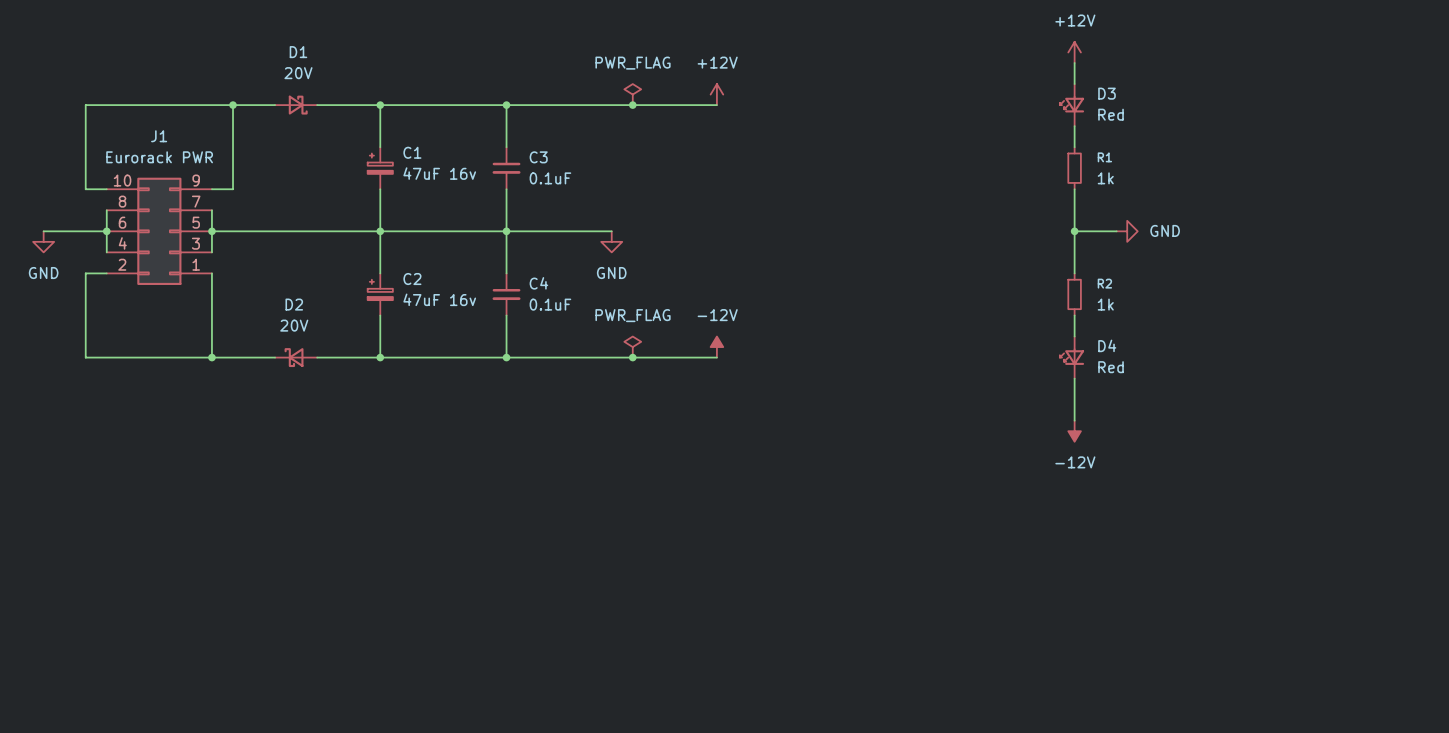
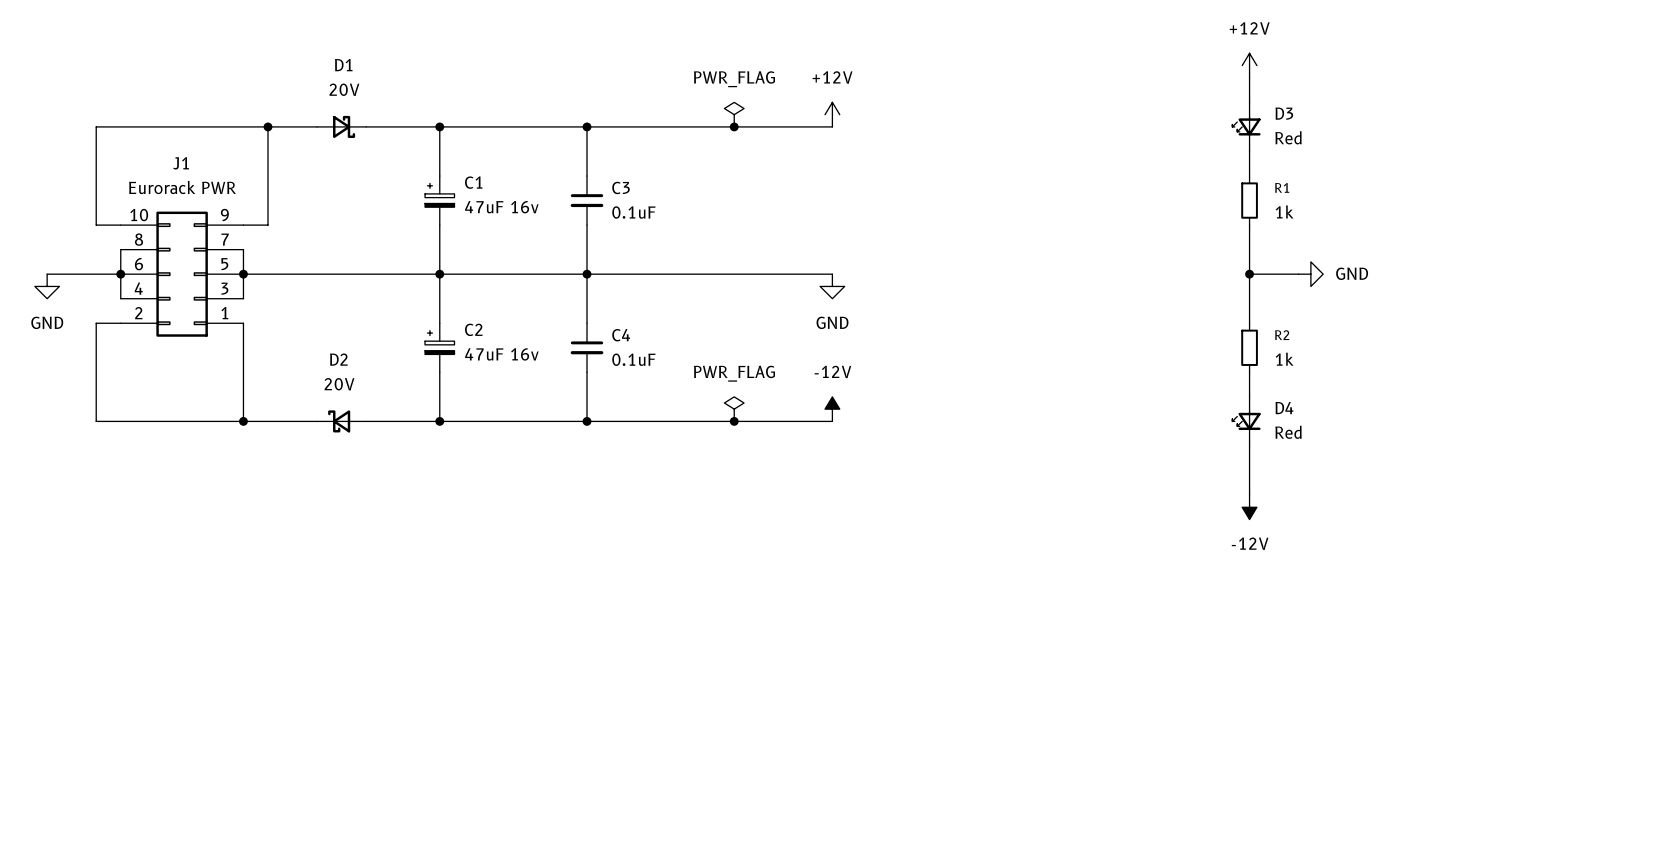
wire: none -> (709, 274) (832, 274)
power symbol position: GND (611, 241) -> GND (832, 286)

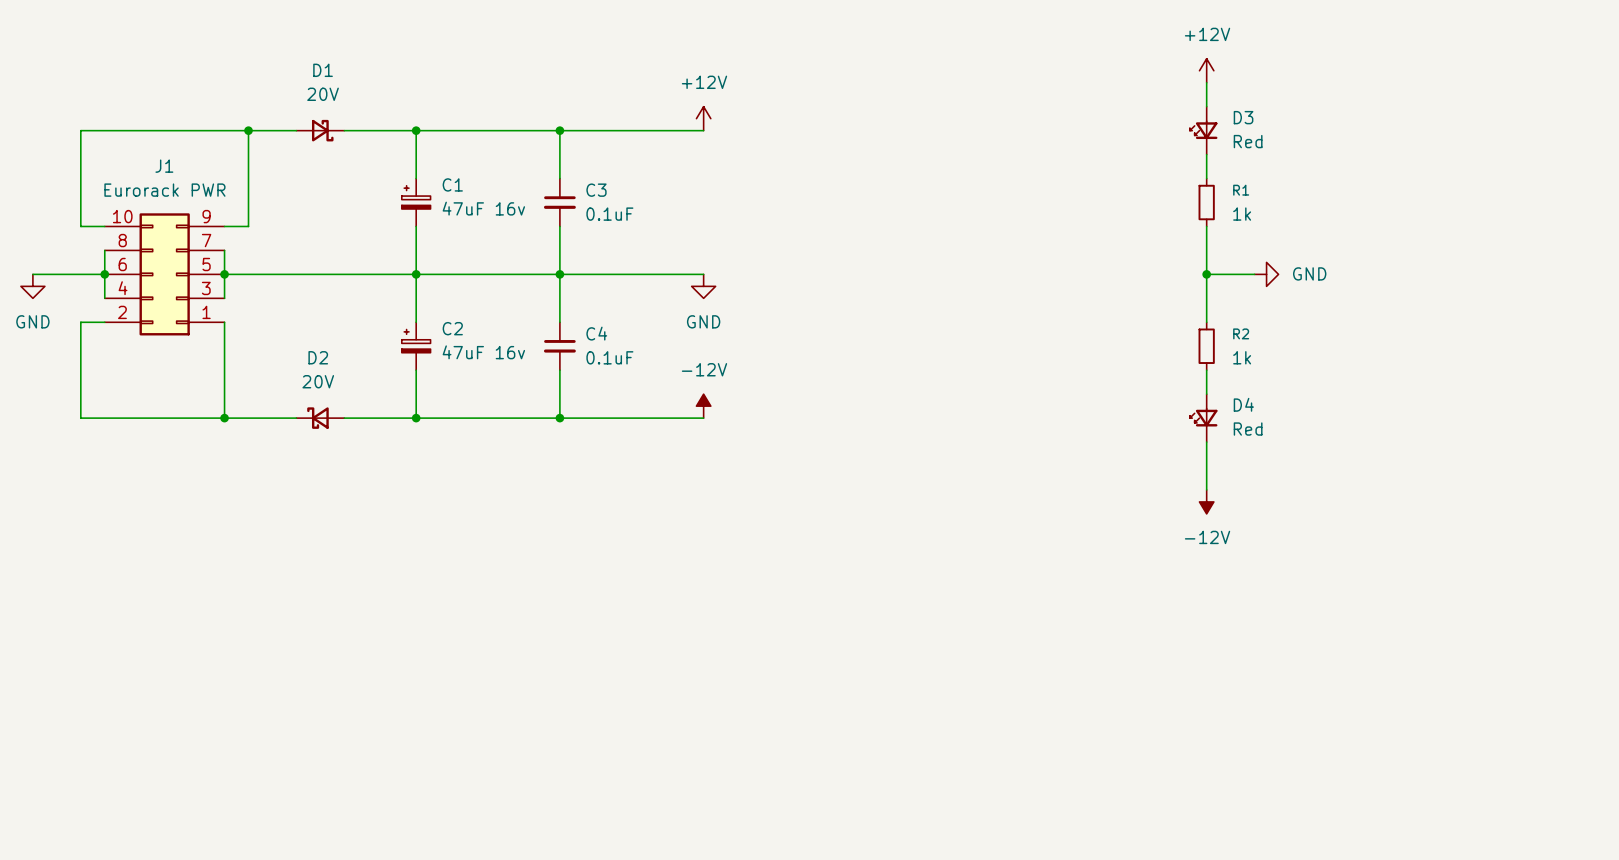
power symbol: PWR_FLAG (734, 114) -> +12V (703, 118)
power symbol: +12V (832, 114) -> none
wire: (734, 126) (832, 126) -> none
junction: (734, 126) -> none
wire: (734, 274) (832, 274) -> none
power symbol position: GND (832, 286) -> GND (703, 286)
power symbol: PWR_FLAG (734, 409) -> -12V (703, 406)
power symbol: -12V (832, 409) -> none
wire: (734, 421) (832, 421) -> none
junction: (734, 421) -> none

